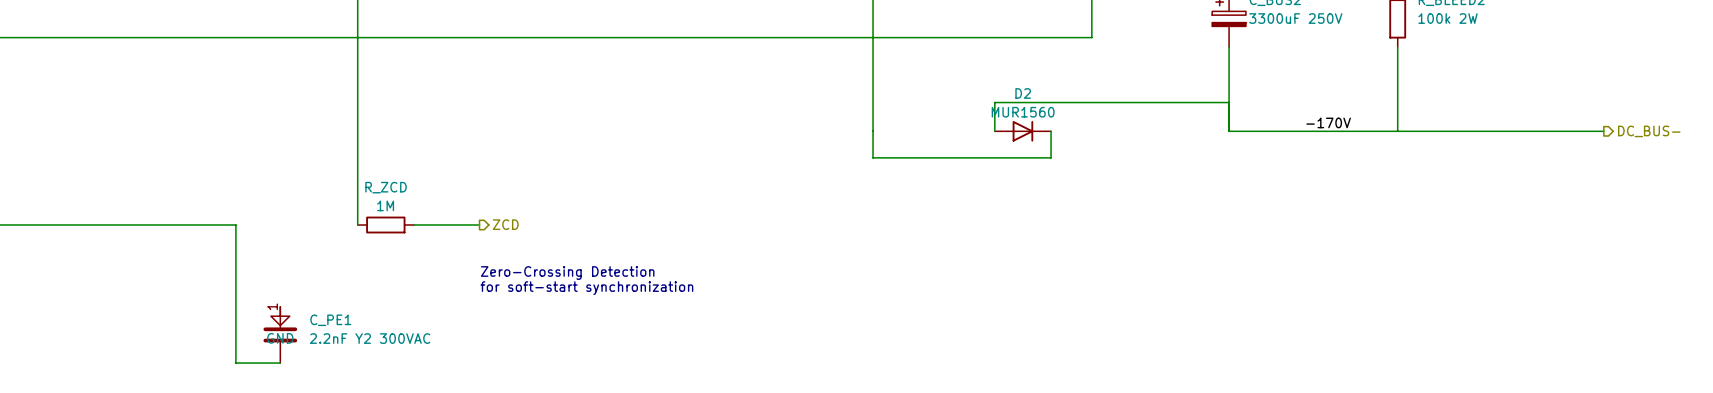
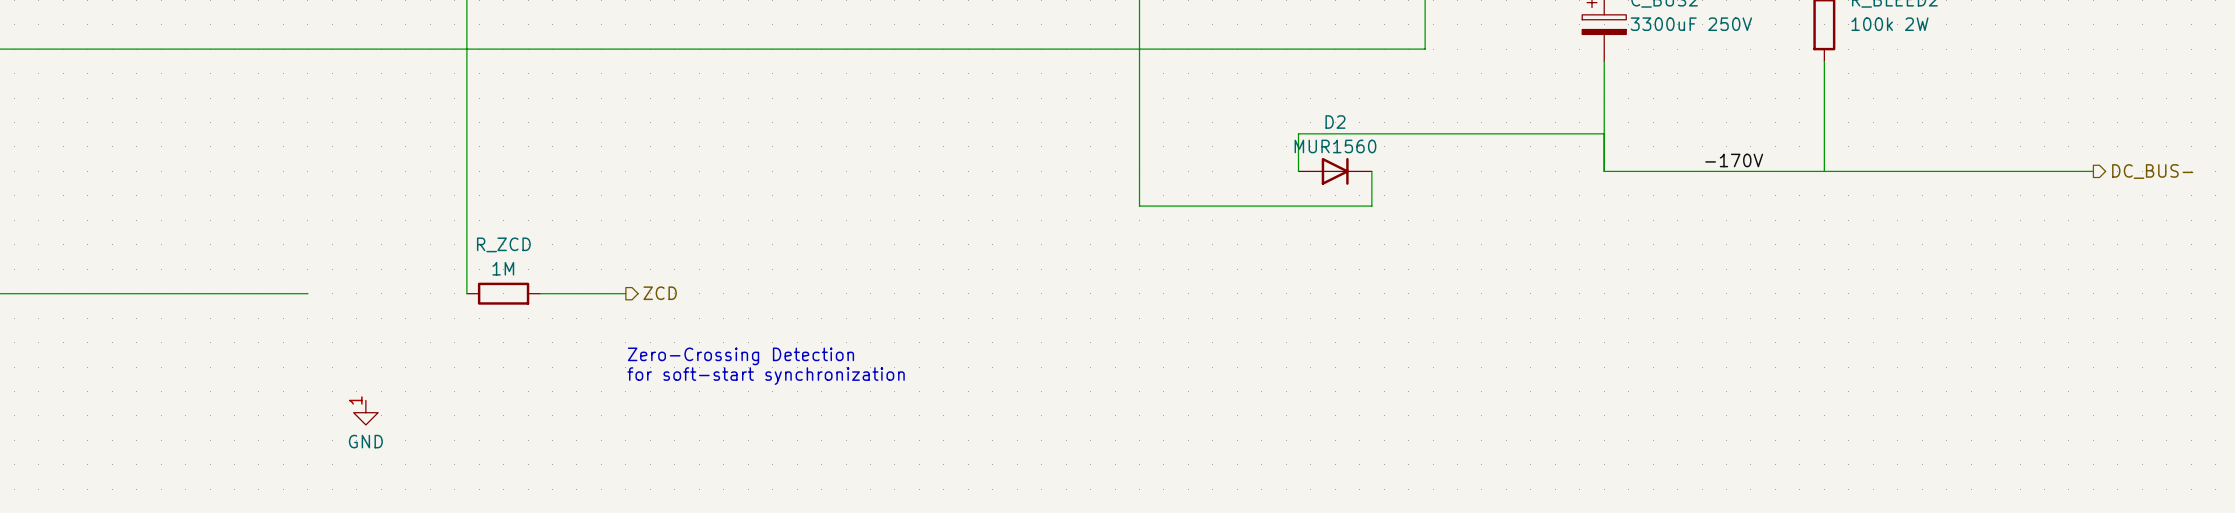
wire: (235, 225) (235, 363) (280, 363) -> none
C_PE1: 2.2nF Y2 300VAC (280, 334) -> none

